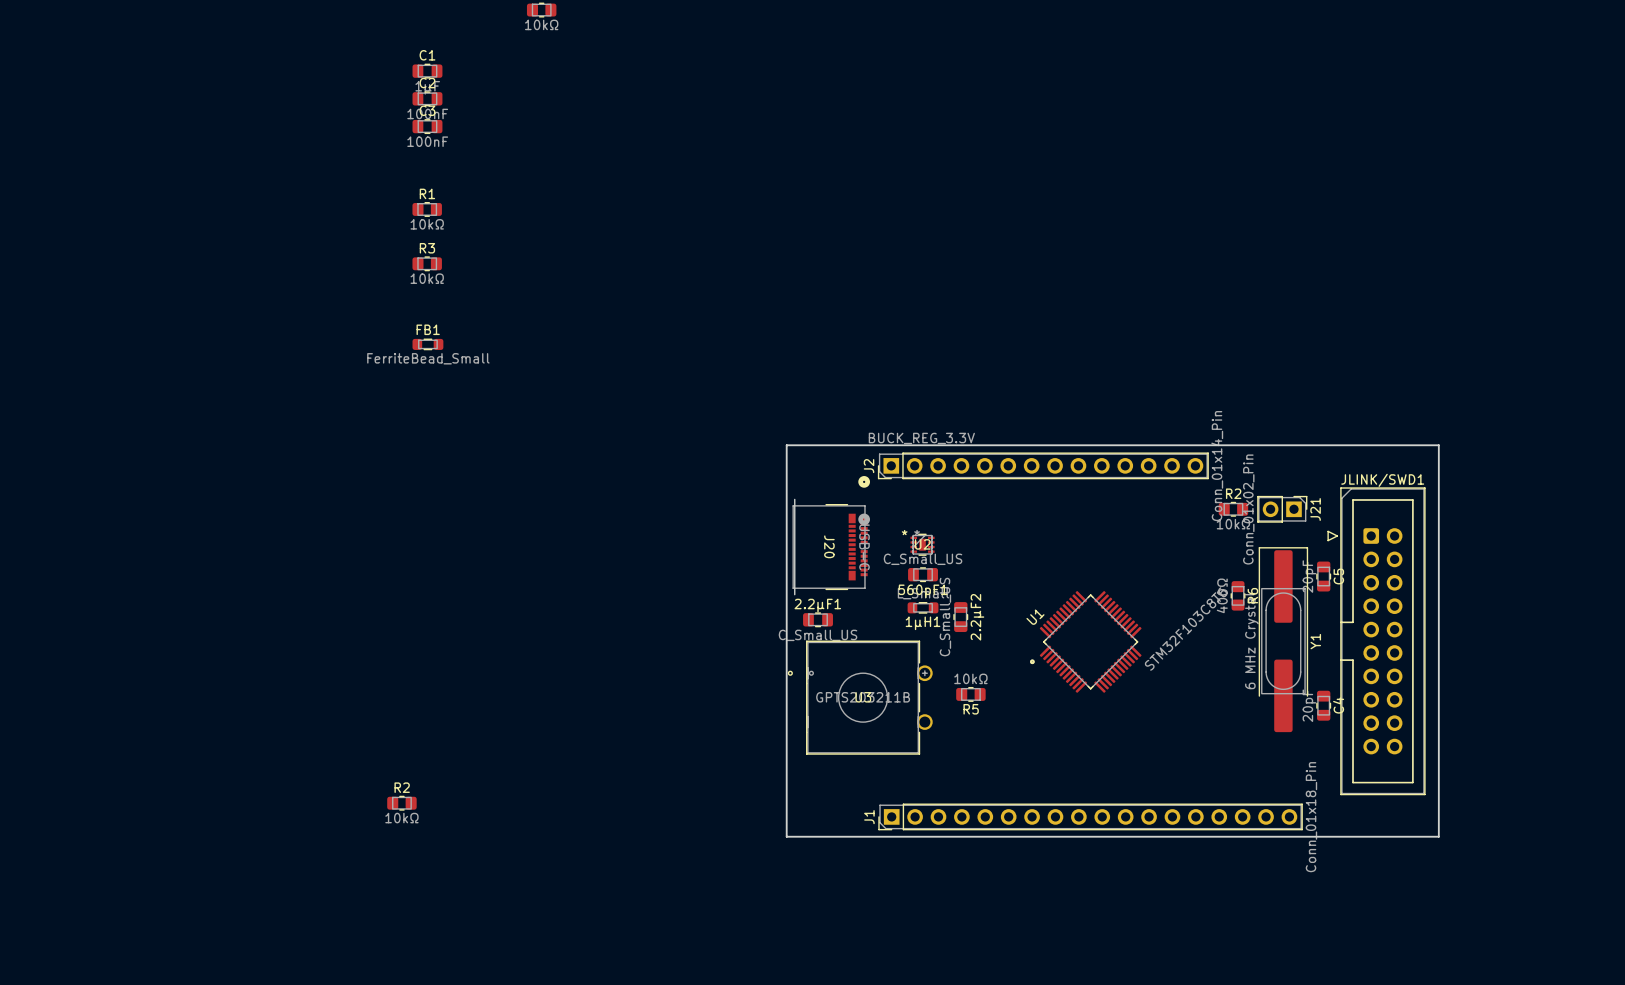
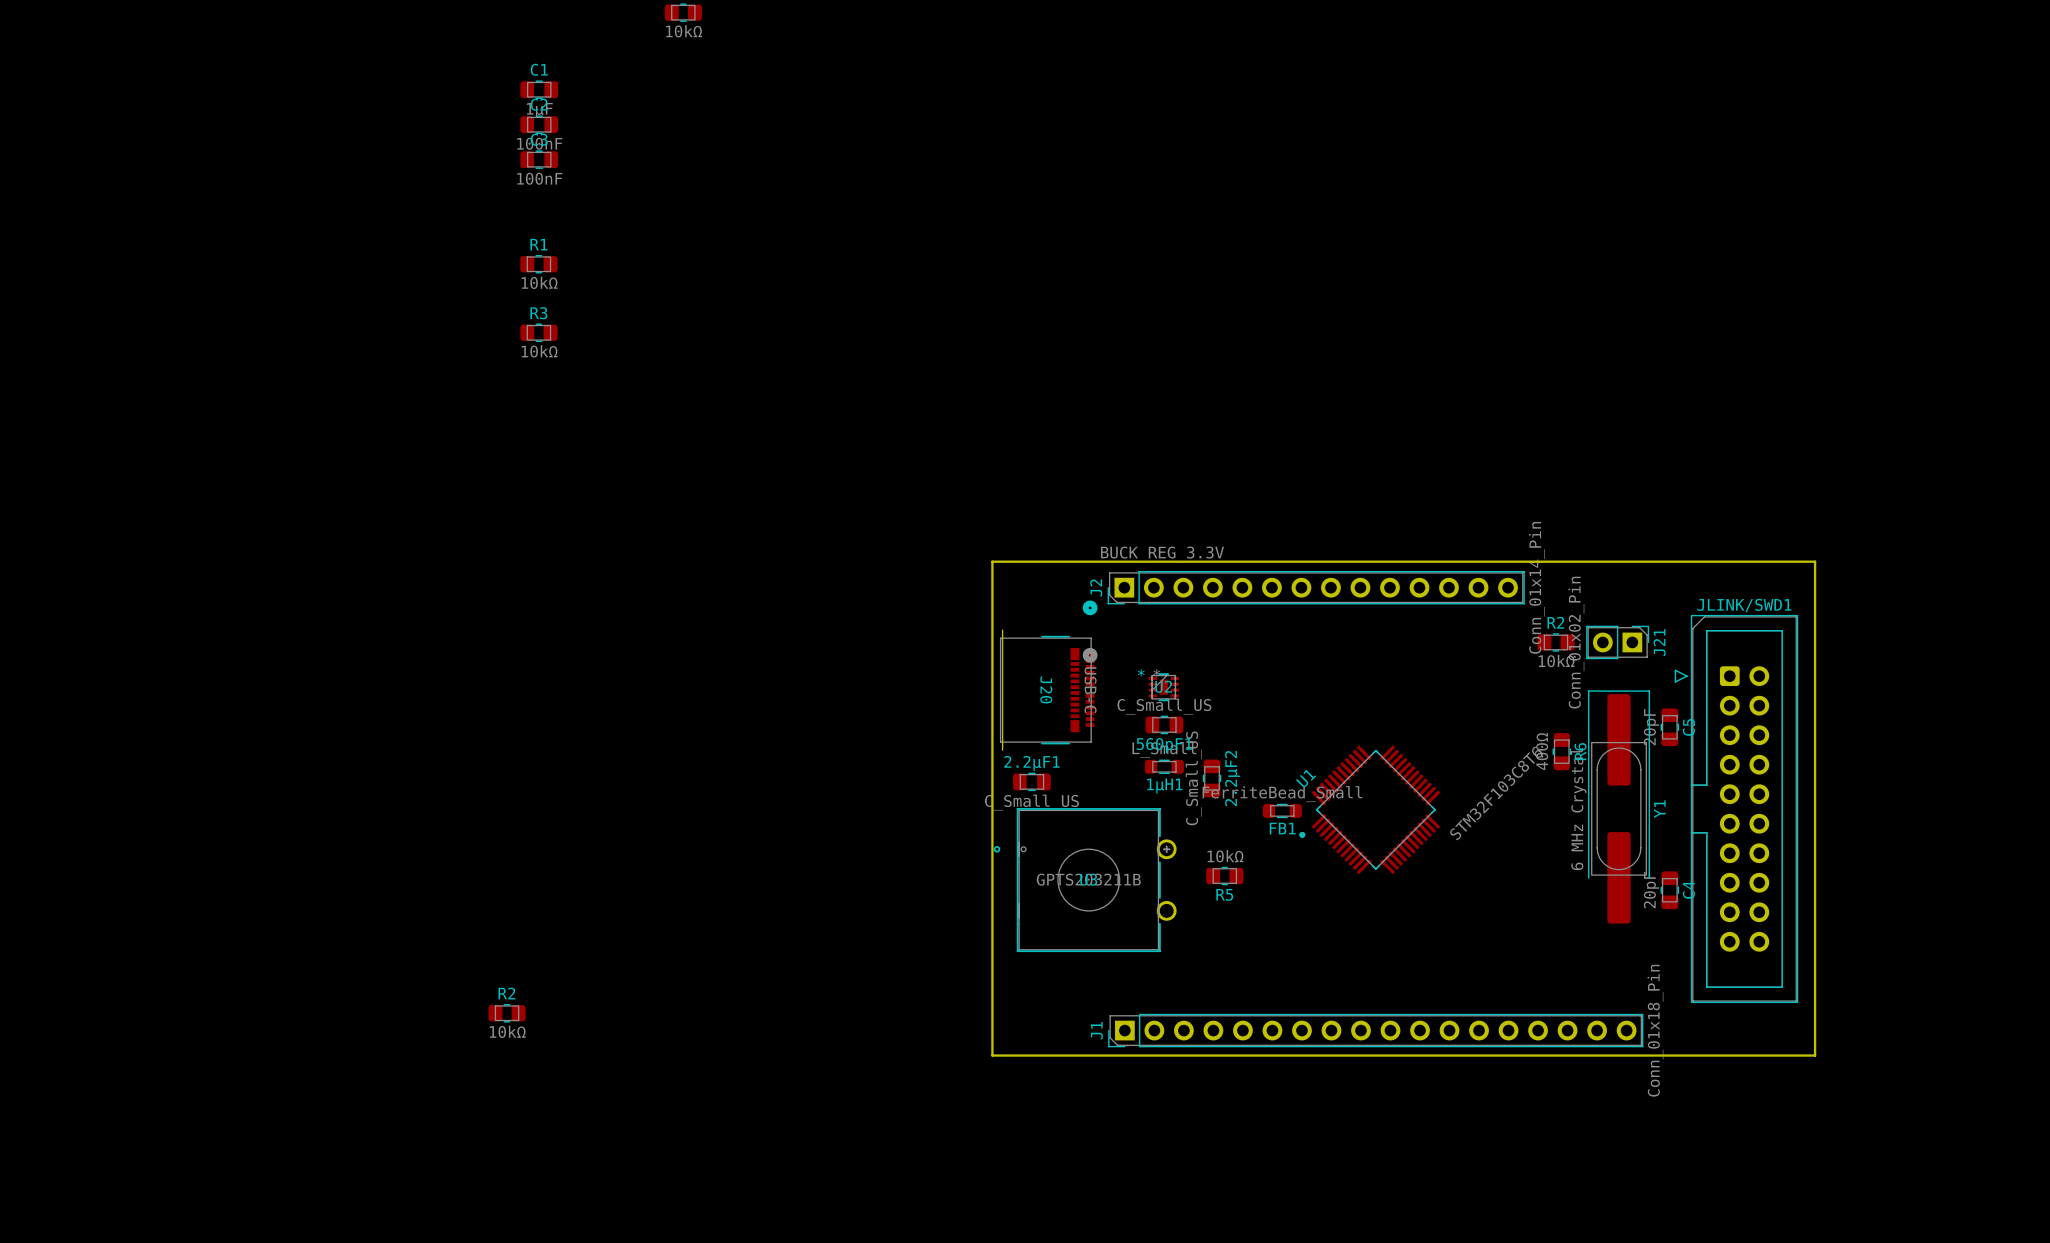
FB1 name position: FB1 (428, 329) -> FB1 (1282, 828)
FB1 position: (427, 344) -> (1282, 810)
FB1 value position: FerriteBead_Small (428, 358) -> FerriteBead_Small (1282, 794)

